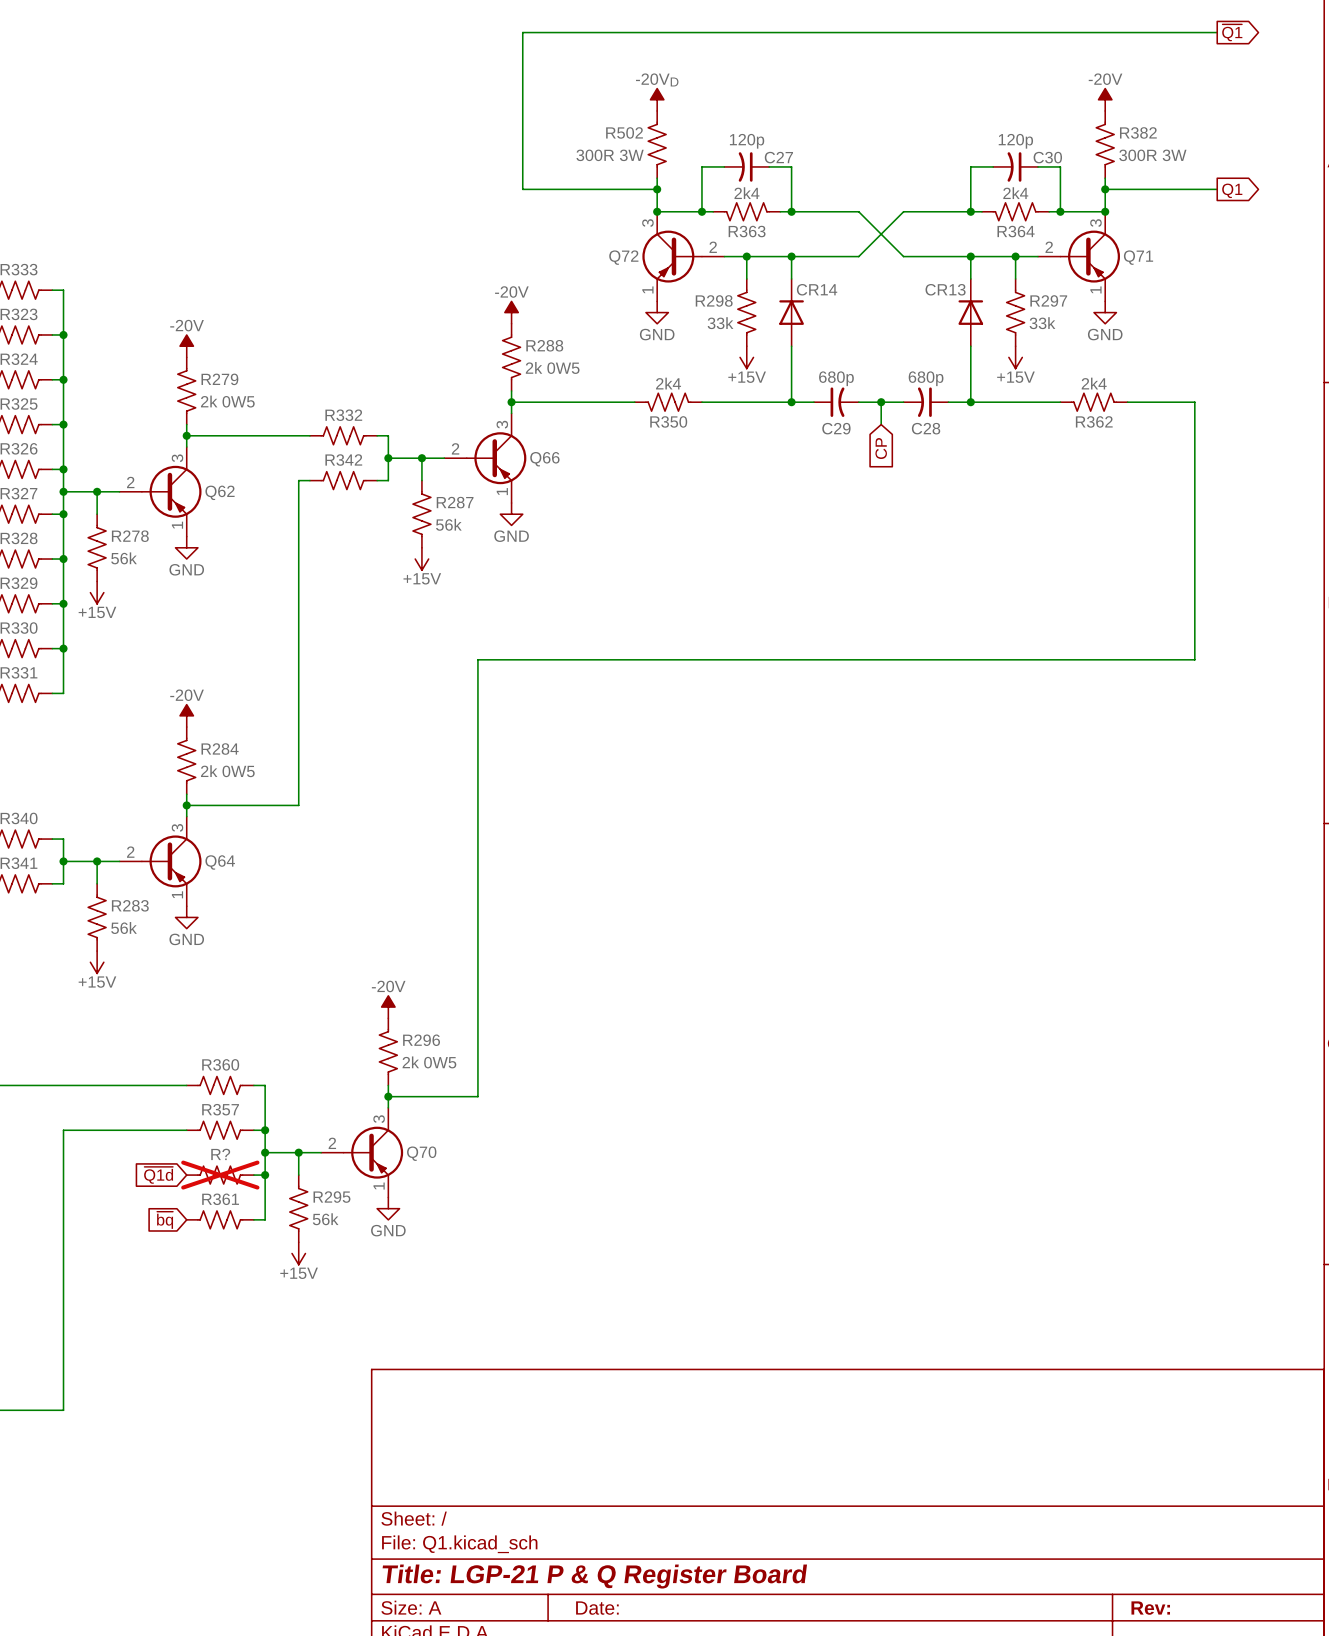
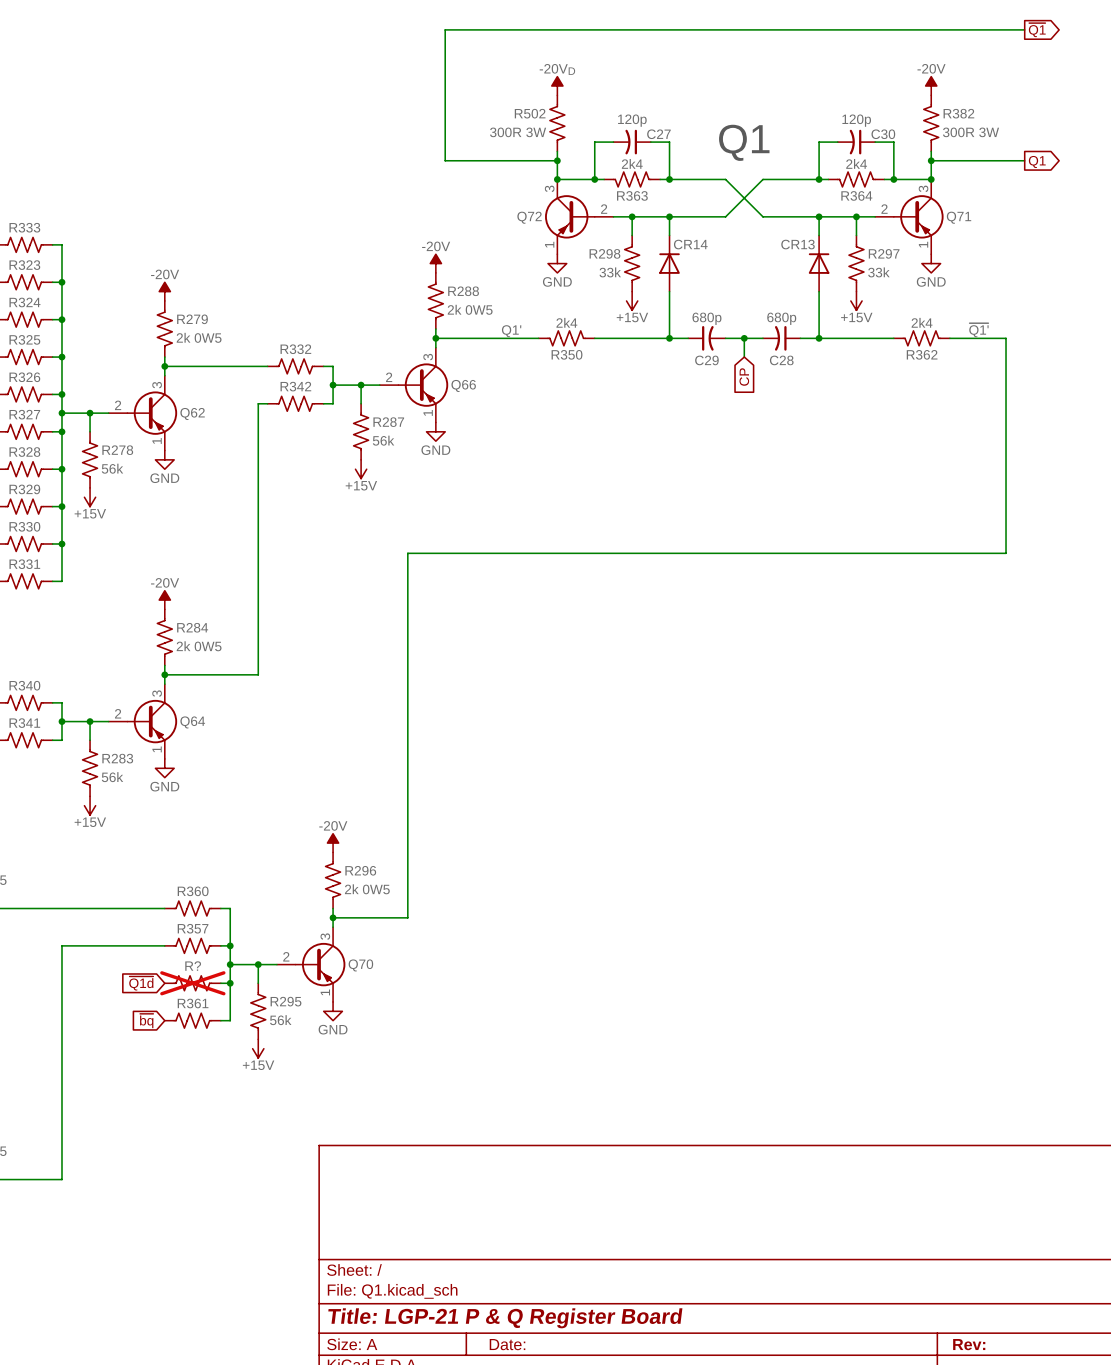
text: none -> Q1 (744, 142)
label: none -> ~{Q1'} (978, 330)
label: none -> Q1' (511, 331)

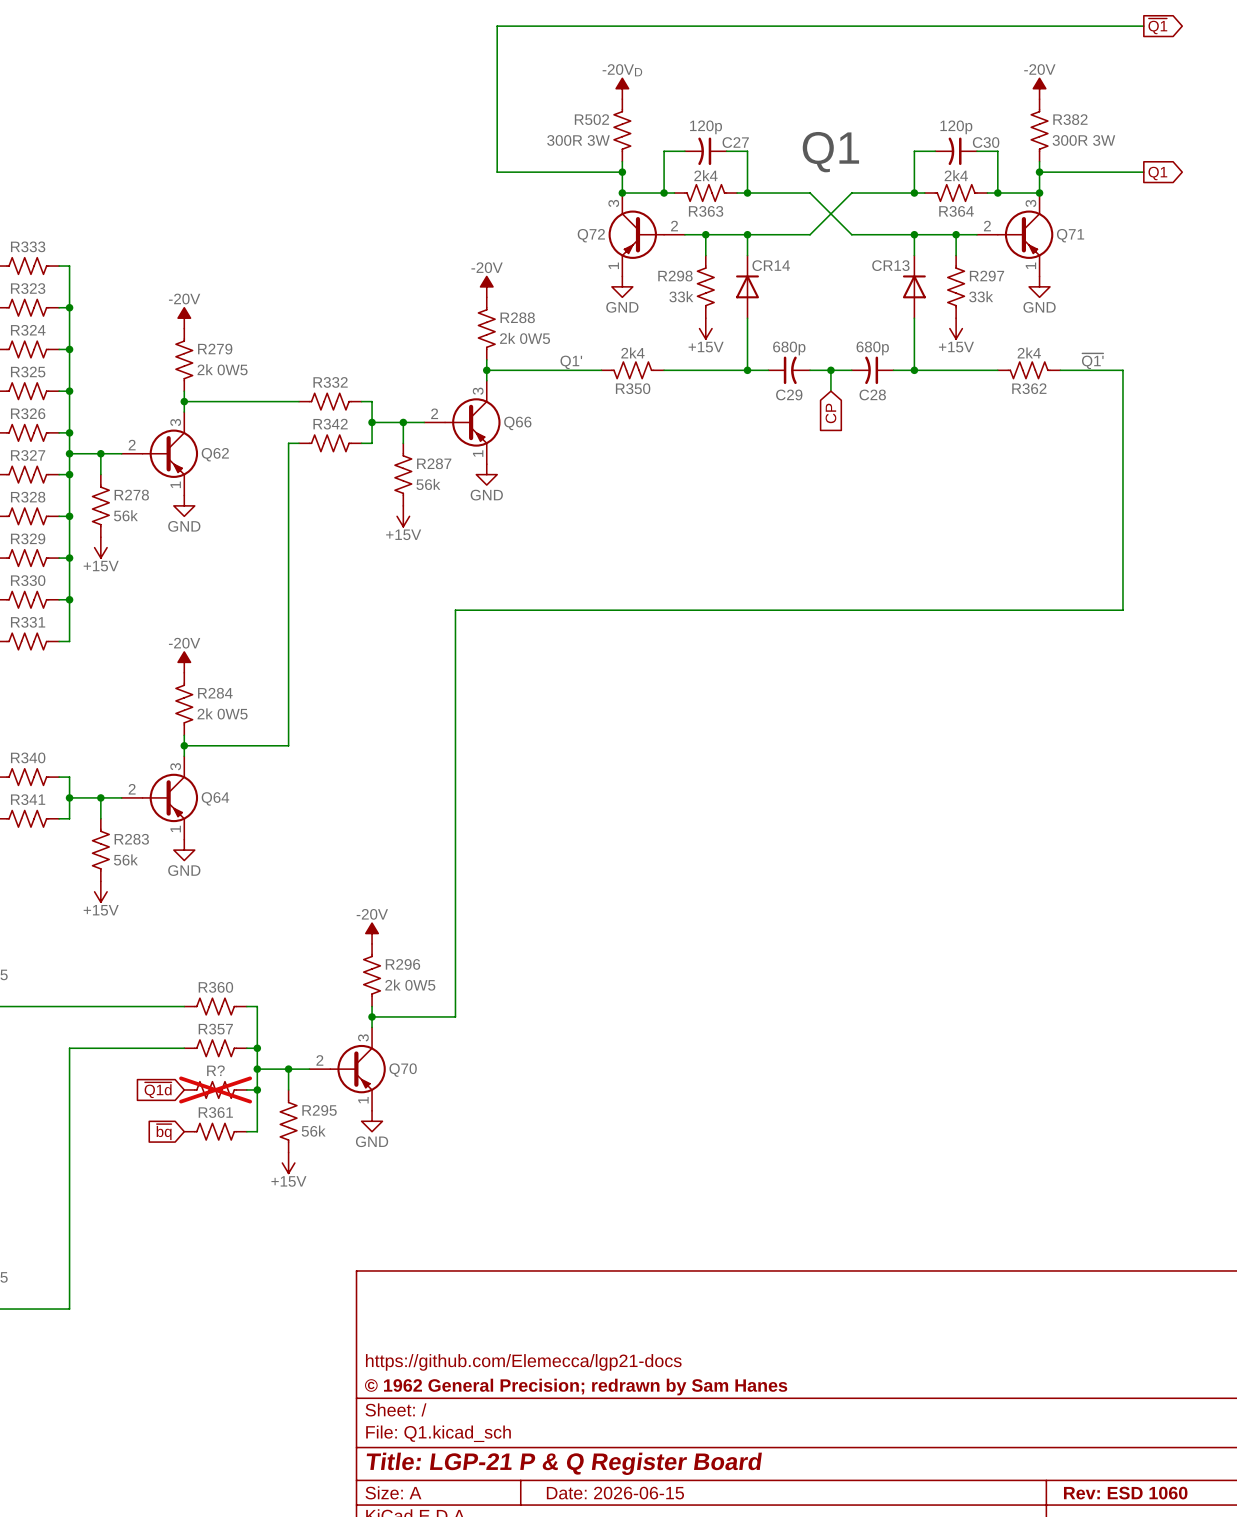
title block: none -> https://github.com/Elemecca/lgp21-docs (523, 1362)
title block: none -> © 1962 General Precision; redrawn by Sam Hanes (576, 1387)
title block: Date: (507, 1344) -> Date: 2026-06-15 (615, 1493)
title block: Rev: (969, 1344) -> Rev: ESD 1060 (1125, 1493)

